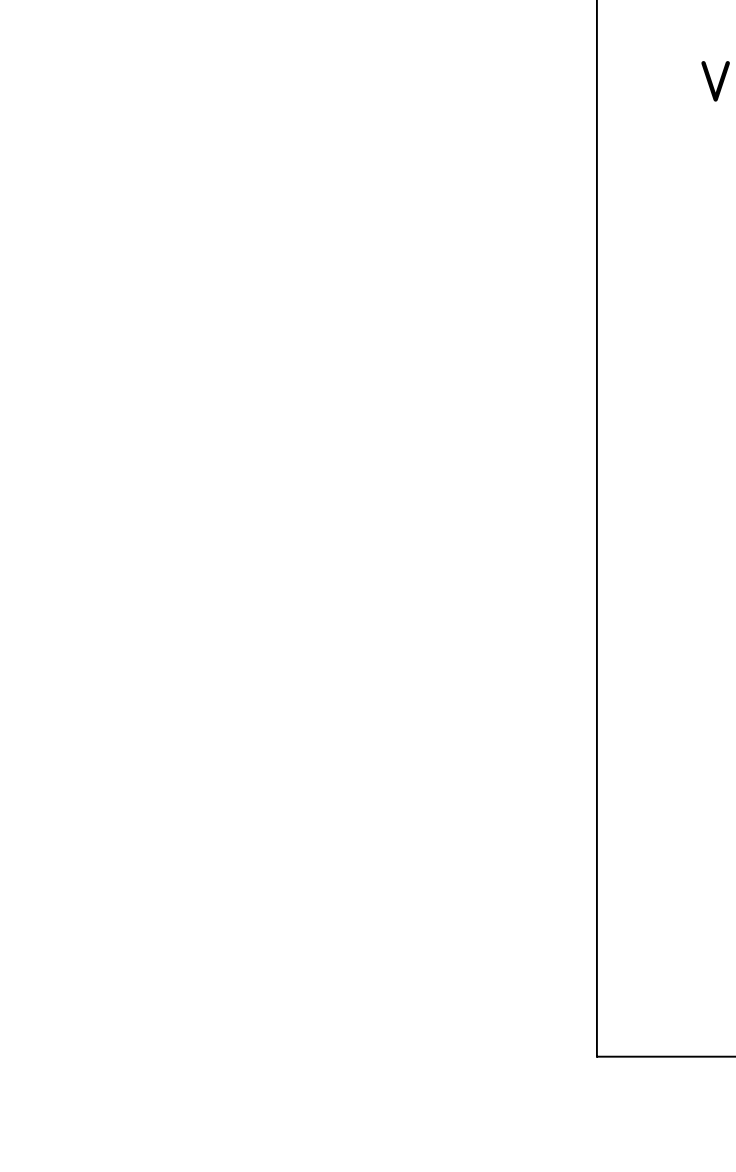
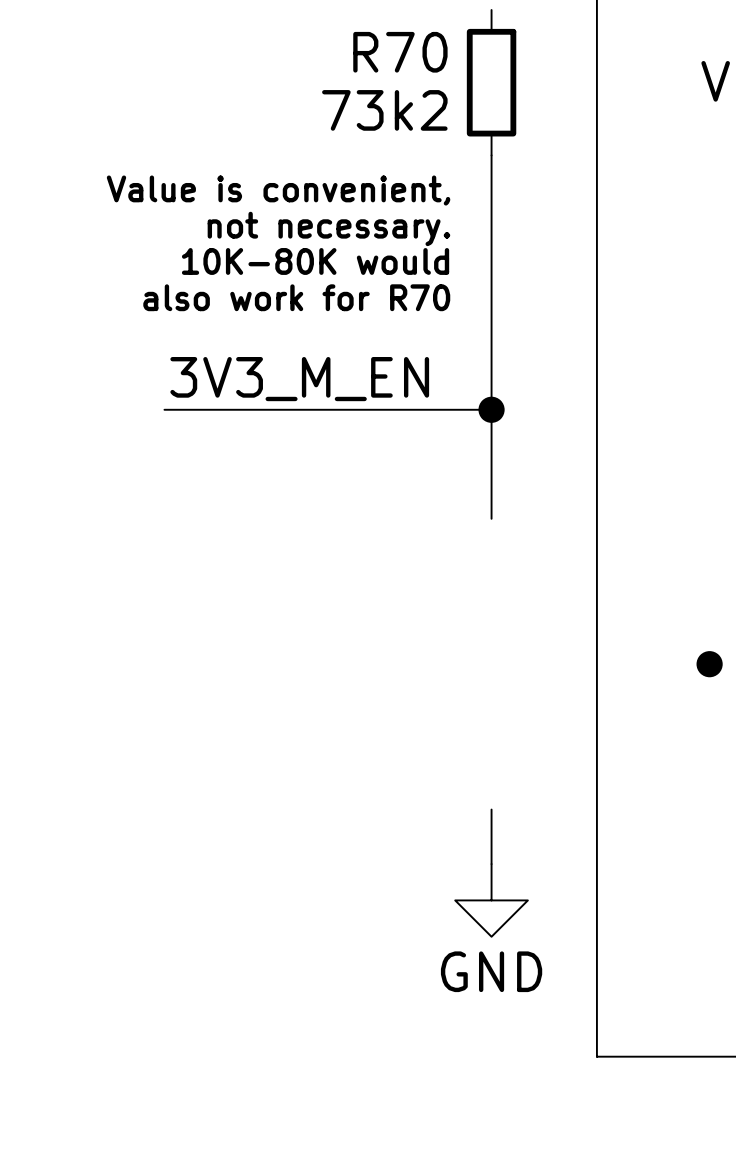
R70: none -> 73k2 (491, 82)
wire: none -> (491, 155) (491, 518)
text: none -> Value is convenient, (278, 190)
text: none -> not necessary. (328, 228)
text: none -> 10K-80K would (315, 261)
text: none -> also work for R70 (296, 297)
label: none -> 3V3_M_EN (299, 379)
wire: none -> (164, 409) (491, 409)
junction: none -> (491, 409)
junction: none -> (709, 664)
wire: none -> (491, 809) (491, 864)
power symbol: none -> GND (491, 900)

